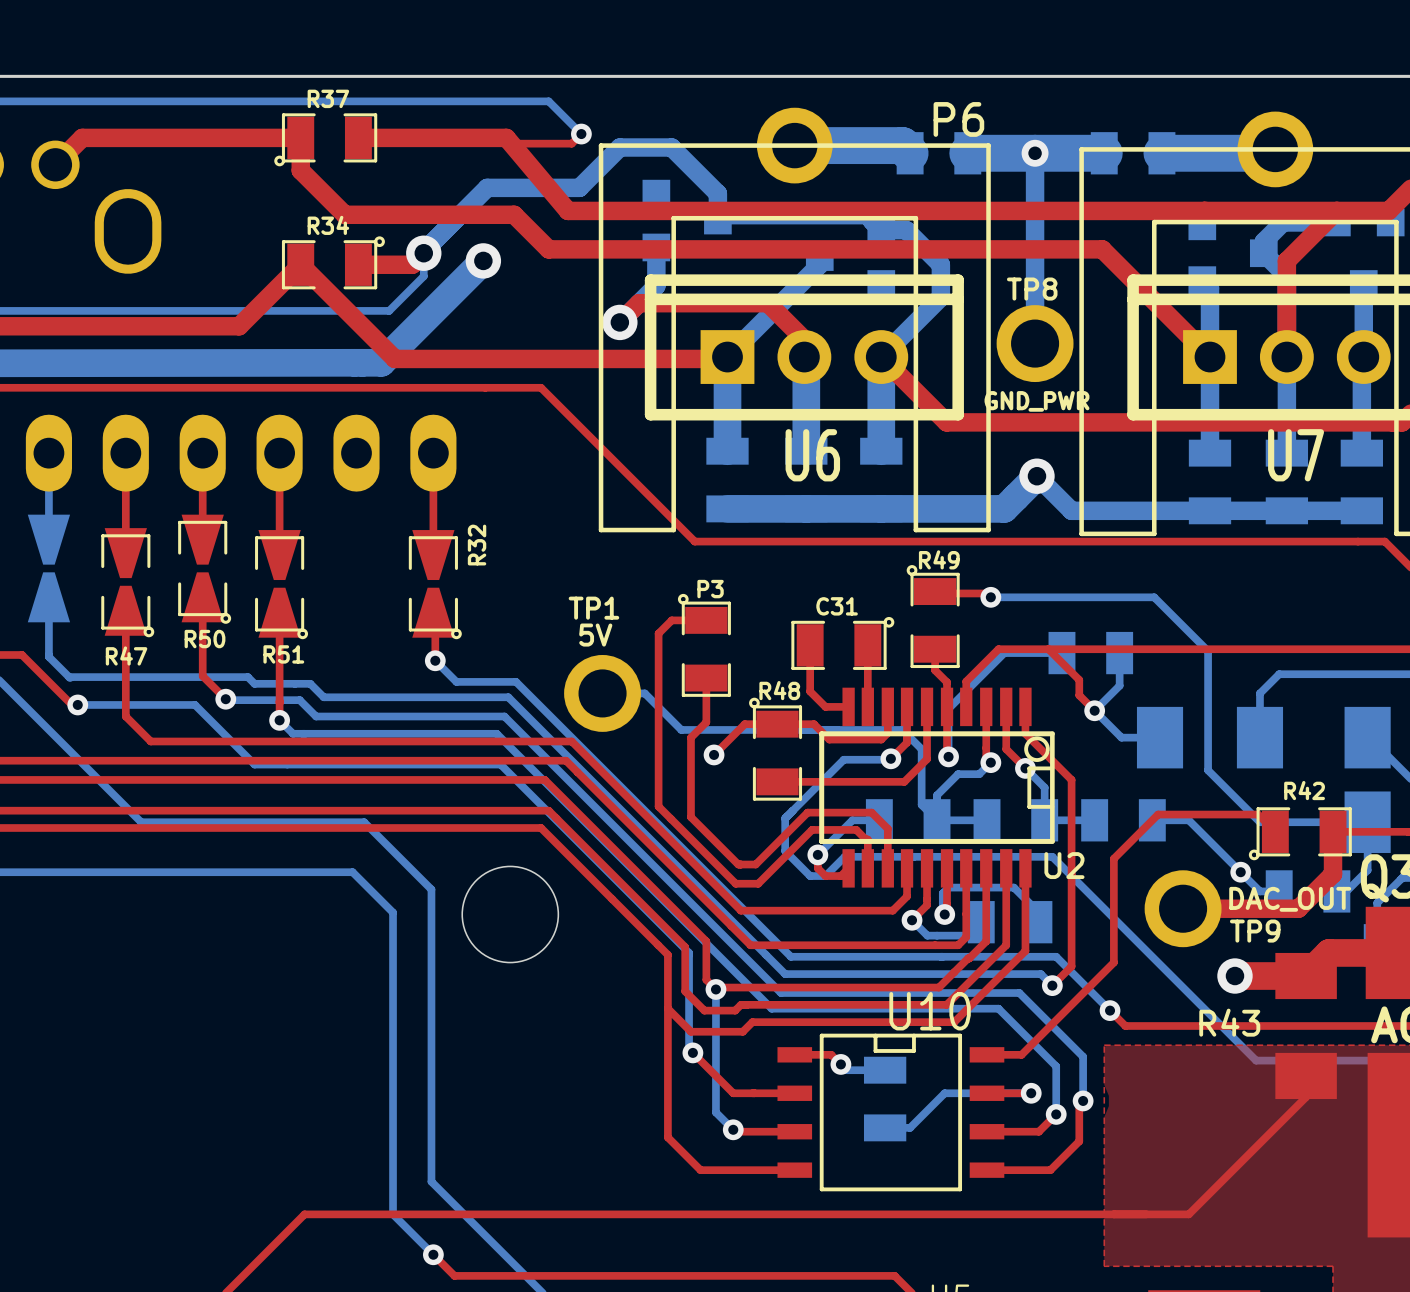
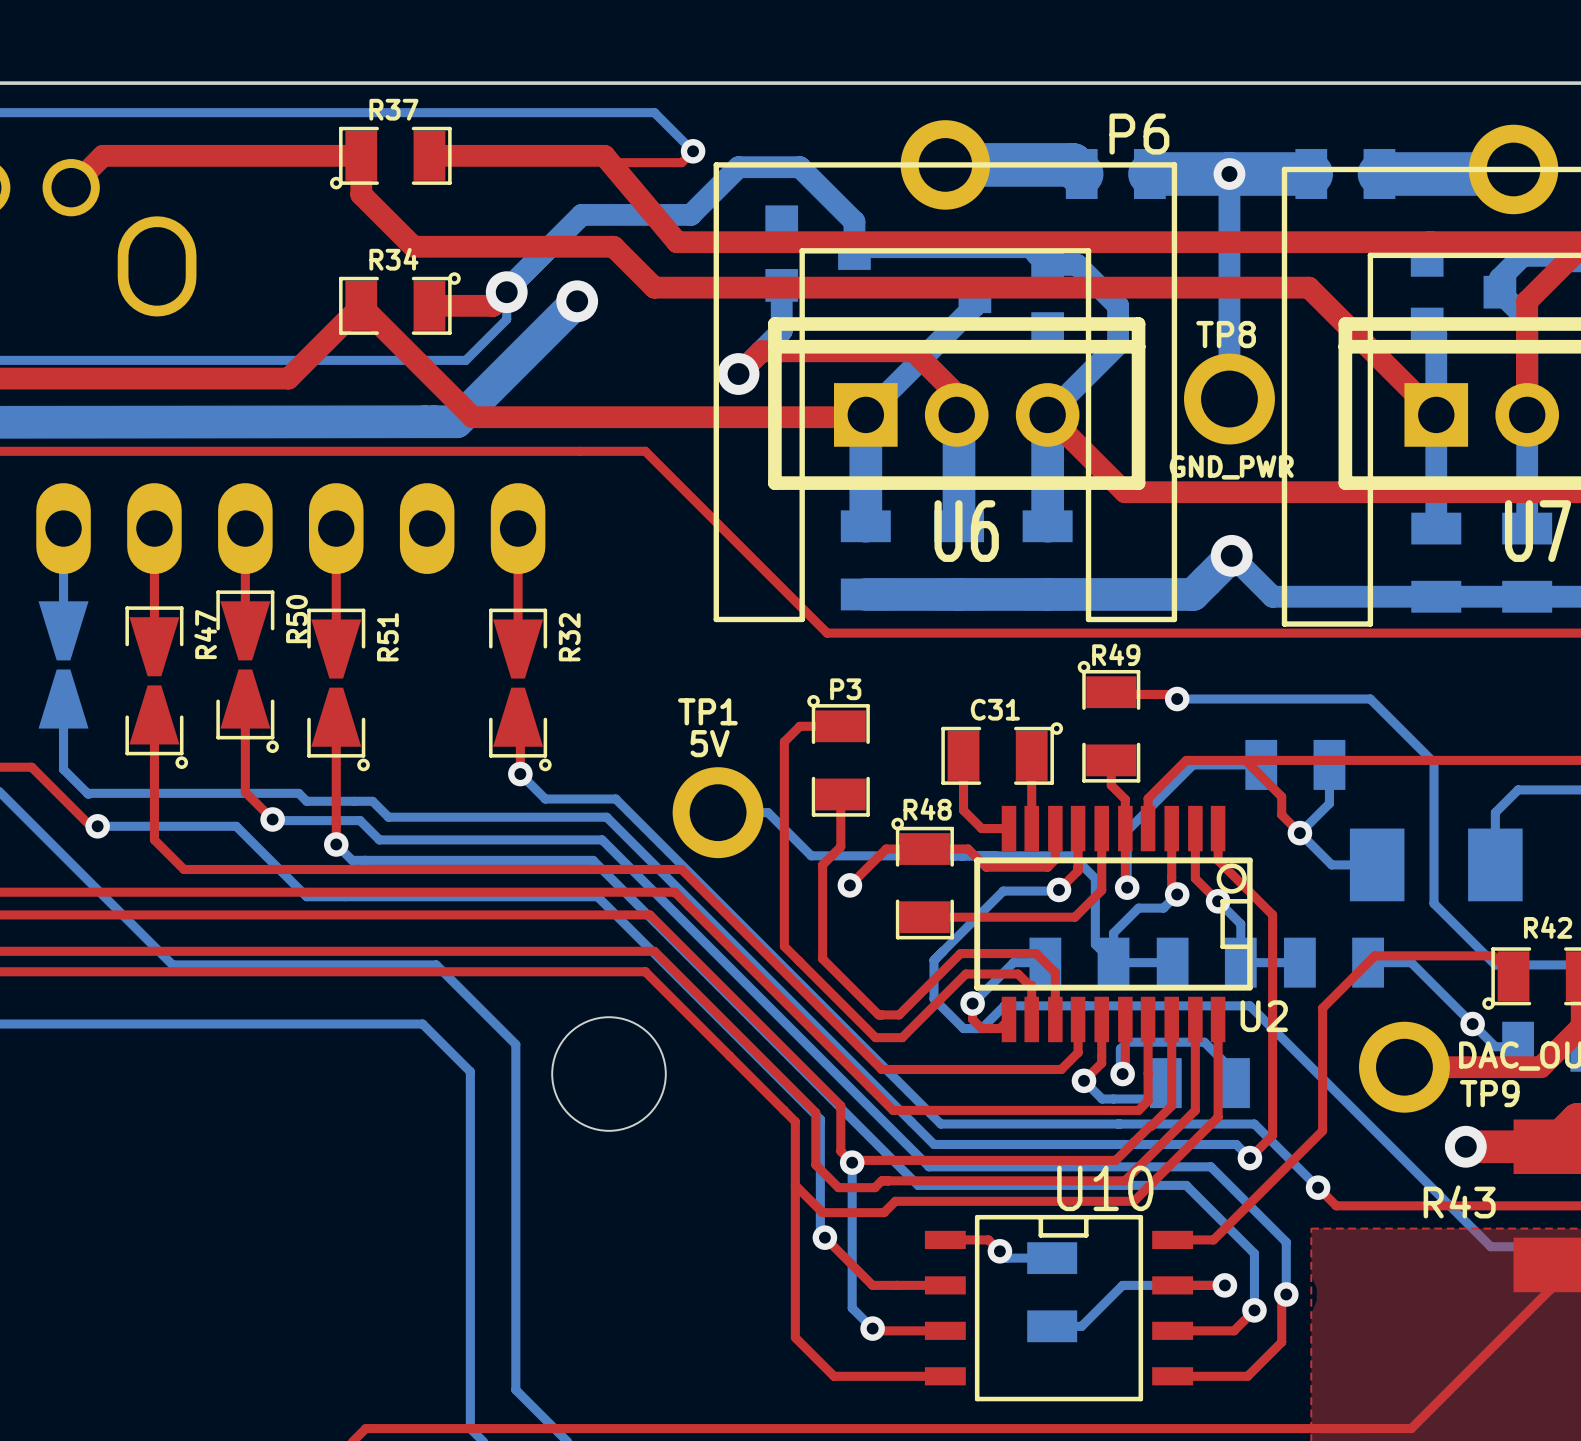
R50 footprint: [178, 514, 232, 624] -> [216, 590, 279, 754]
R47 footprint: [101, 528, 155, 638] -> [125, 606, 189, 769]
R51 footprint: [255, 530, 309, 640] -> [307, 608, 370, 772]
R32 footprint: [408, 530, 462, 640] -> [489, 608, 552, 772]
R50 name rotation: 0° (205, 639) -> 90° counterclockwise (296, 619)
R50 name position: R50 (205, 639) -> R50 (296, 619)
R51 name rotation: 0° (283, 654) -> 90° counterclockwise (387, 637)
R51 name position: R51 (283, 654) -> R51 (387, 637)
R47 name rotation: 0° (126, 655) -> 90° counterclockwise (205, 634)
R47 name position: R47 (126, 655) -> R47 (205, 634)

